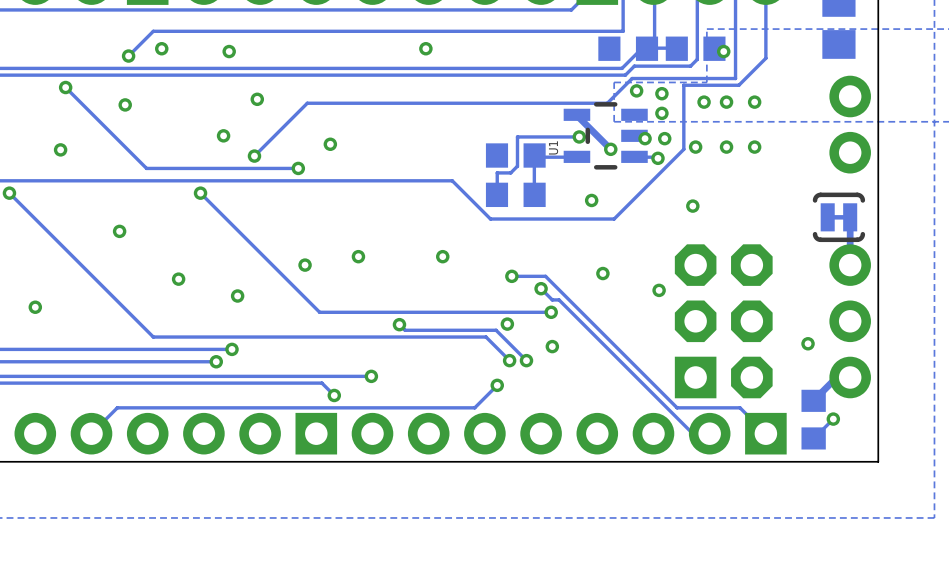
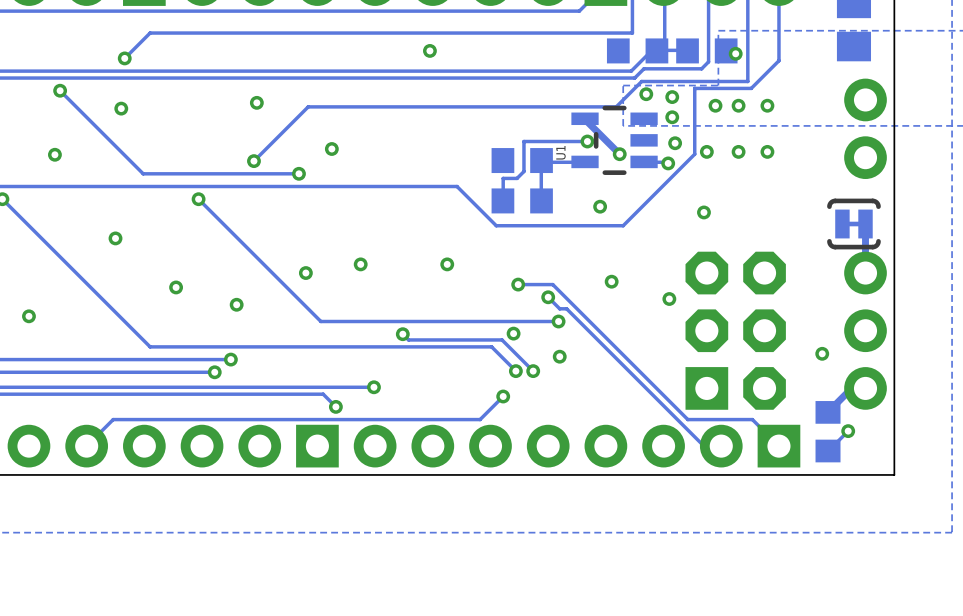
via: (161, 48) -> none
via: (229, 51) -> none
via: (223, 135) -> none
via: (645, 138) -> none

